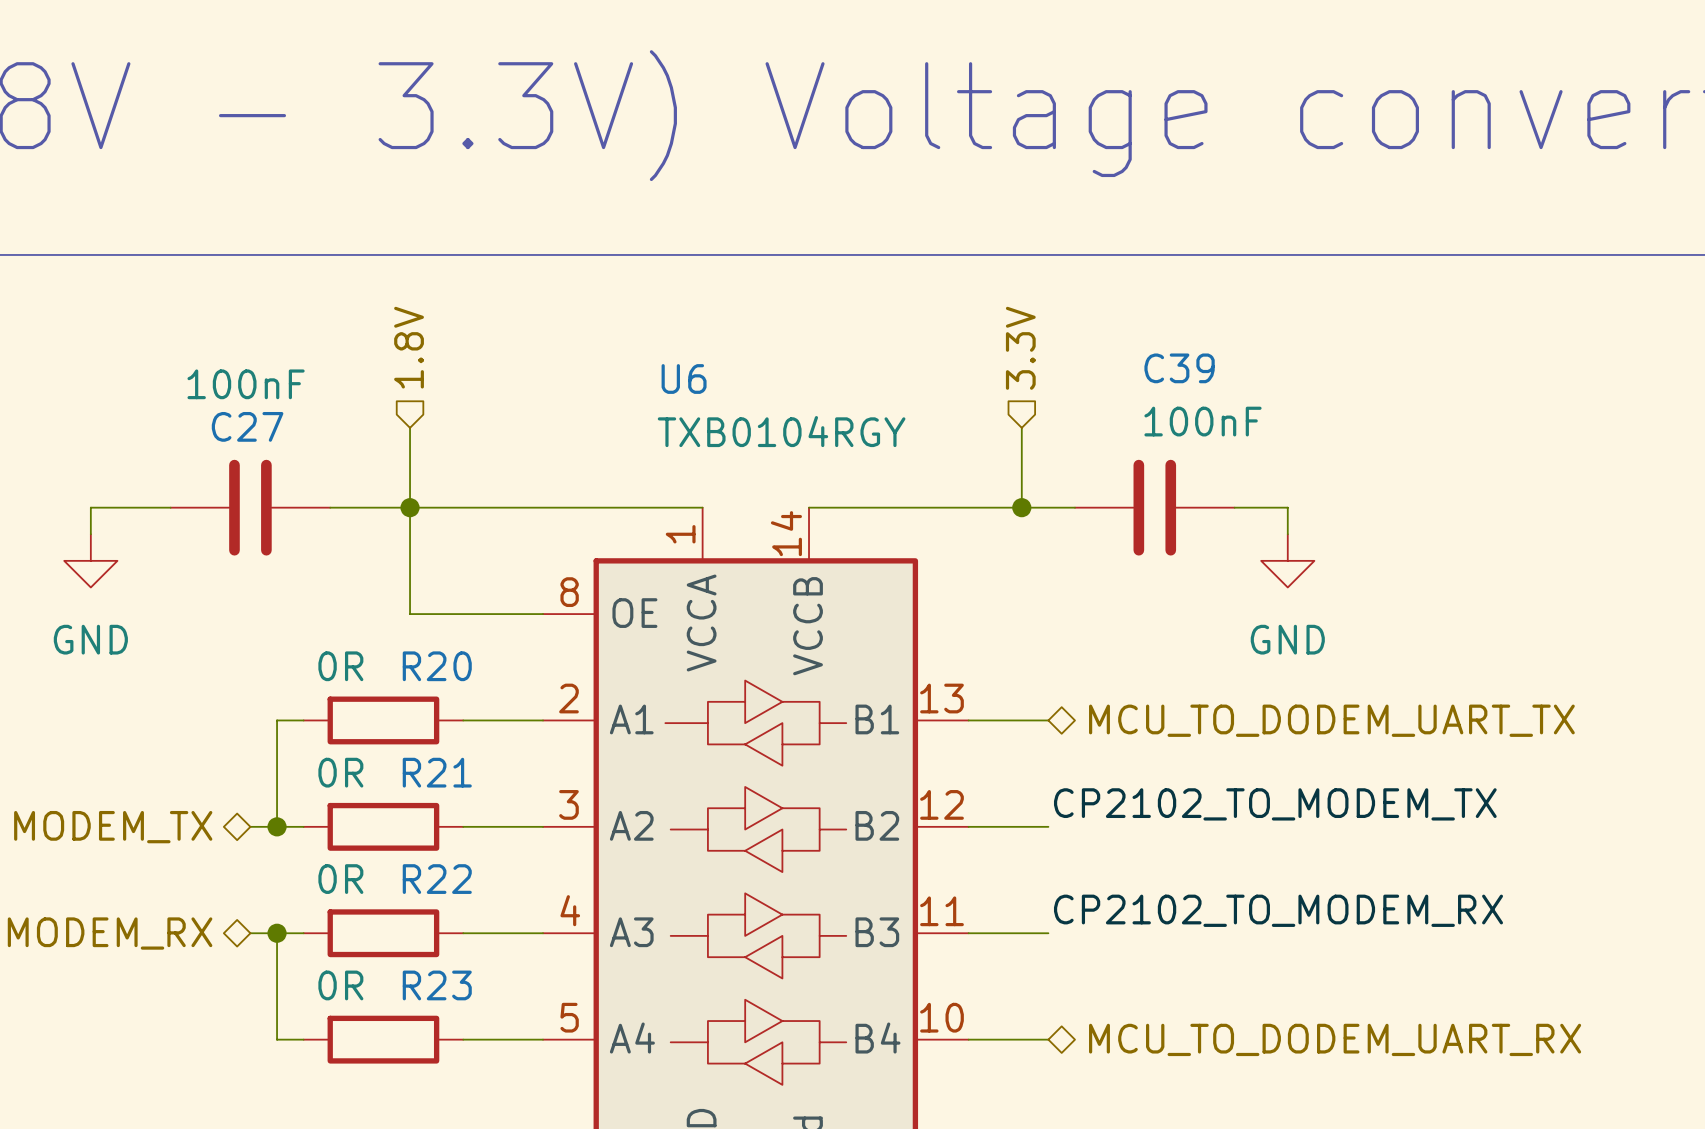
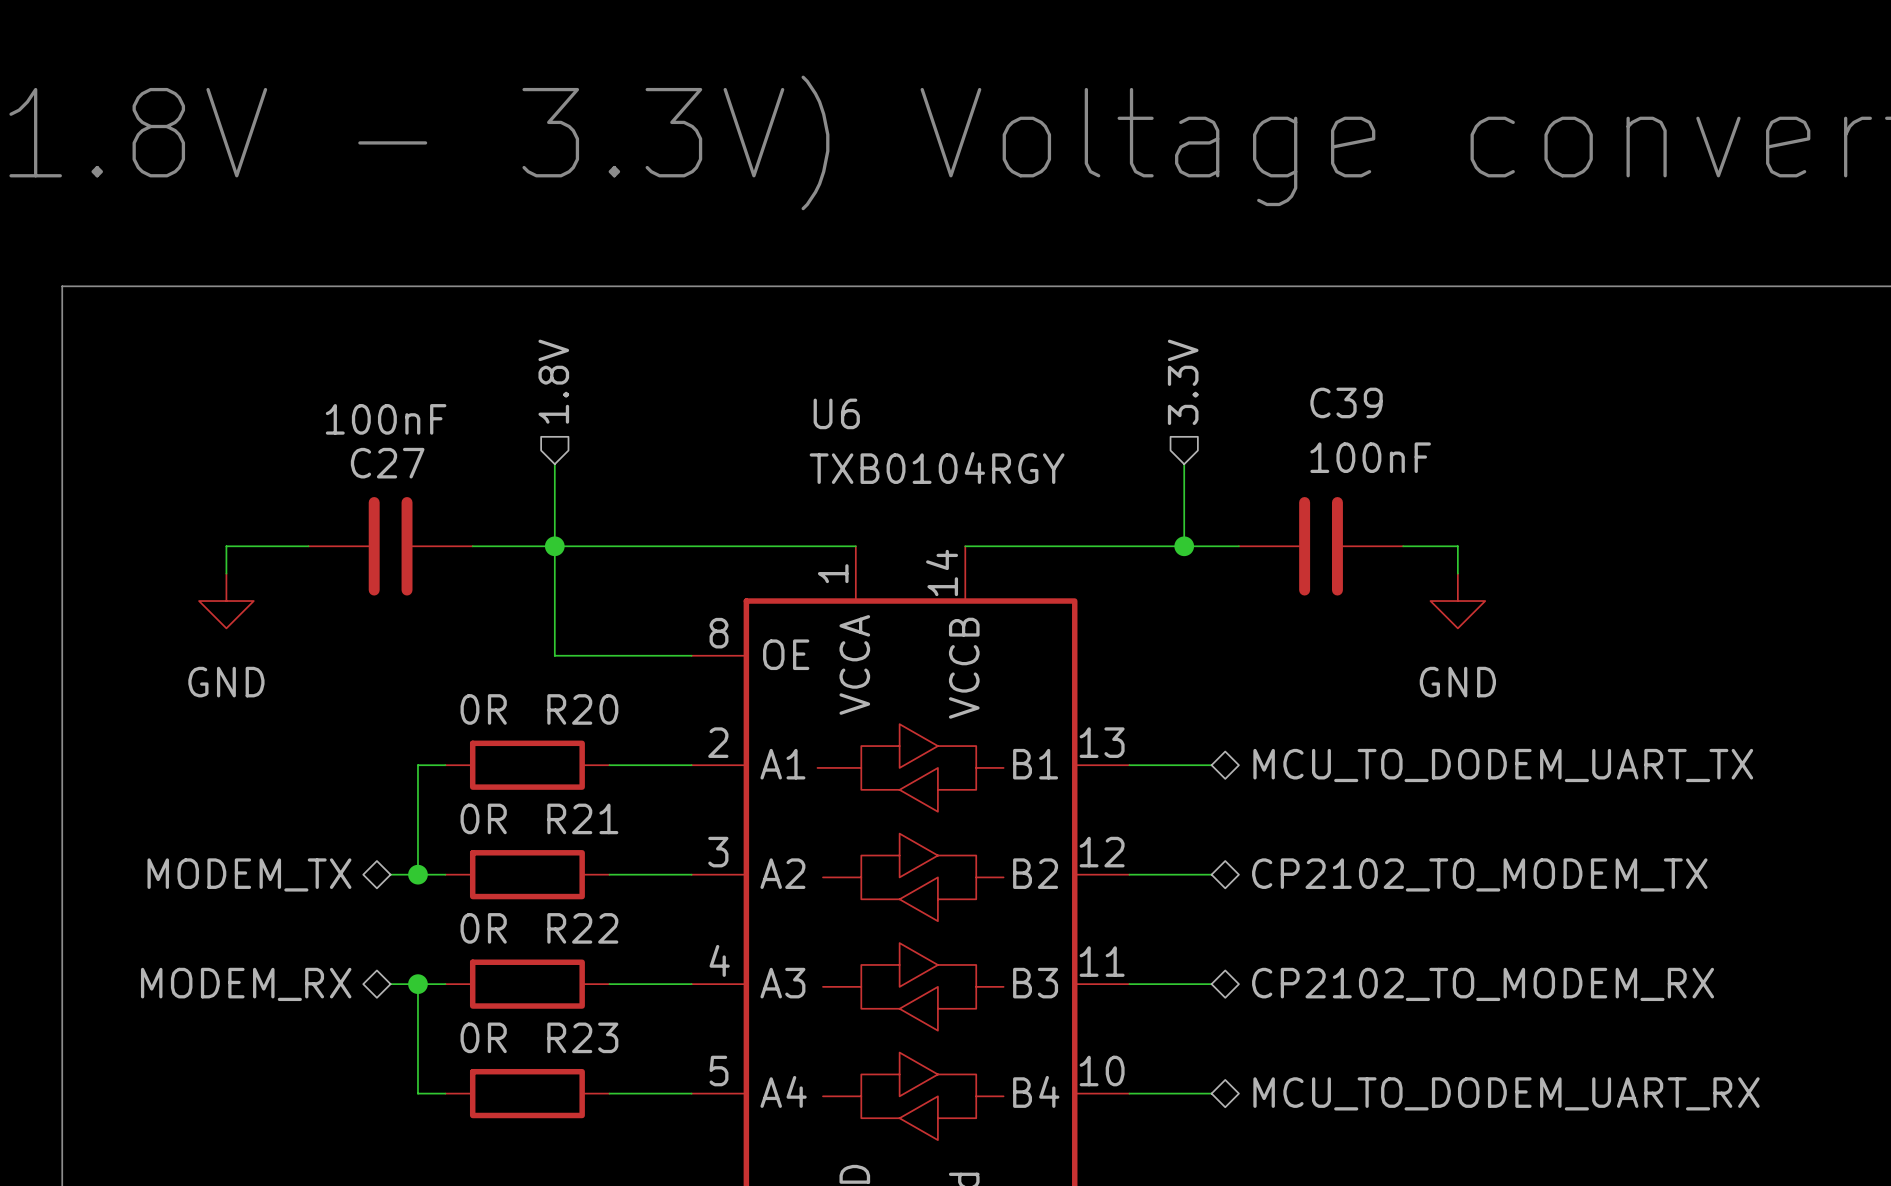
label: CP2102_TO_MODEM_TX (1275, 804) -> none
hierarchical label: none -> CP2102_TO_MODEM_TX (1479, 874)
label: CP2102_TO_MODEM_RX (1278, 910) -> none
hierarchical label: none -> CP2102_TO_MODEM_RX (1483, 984)

